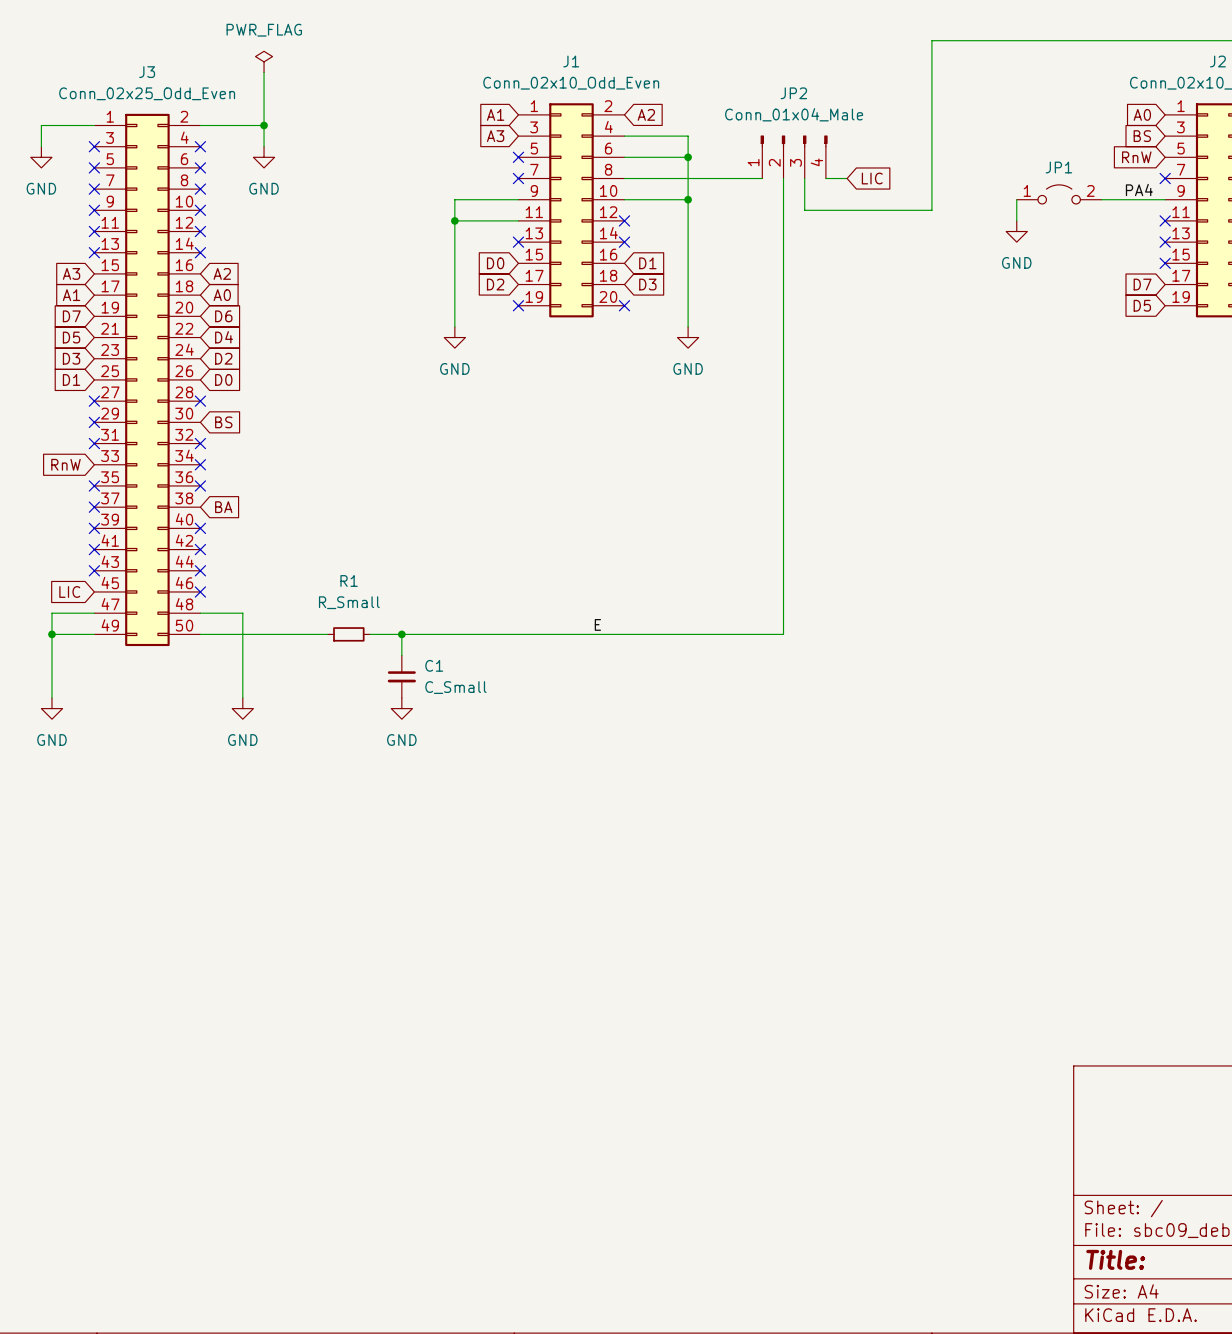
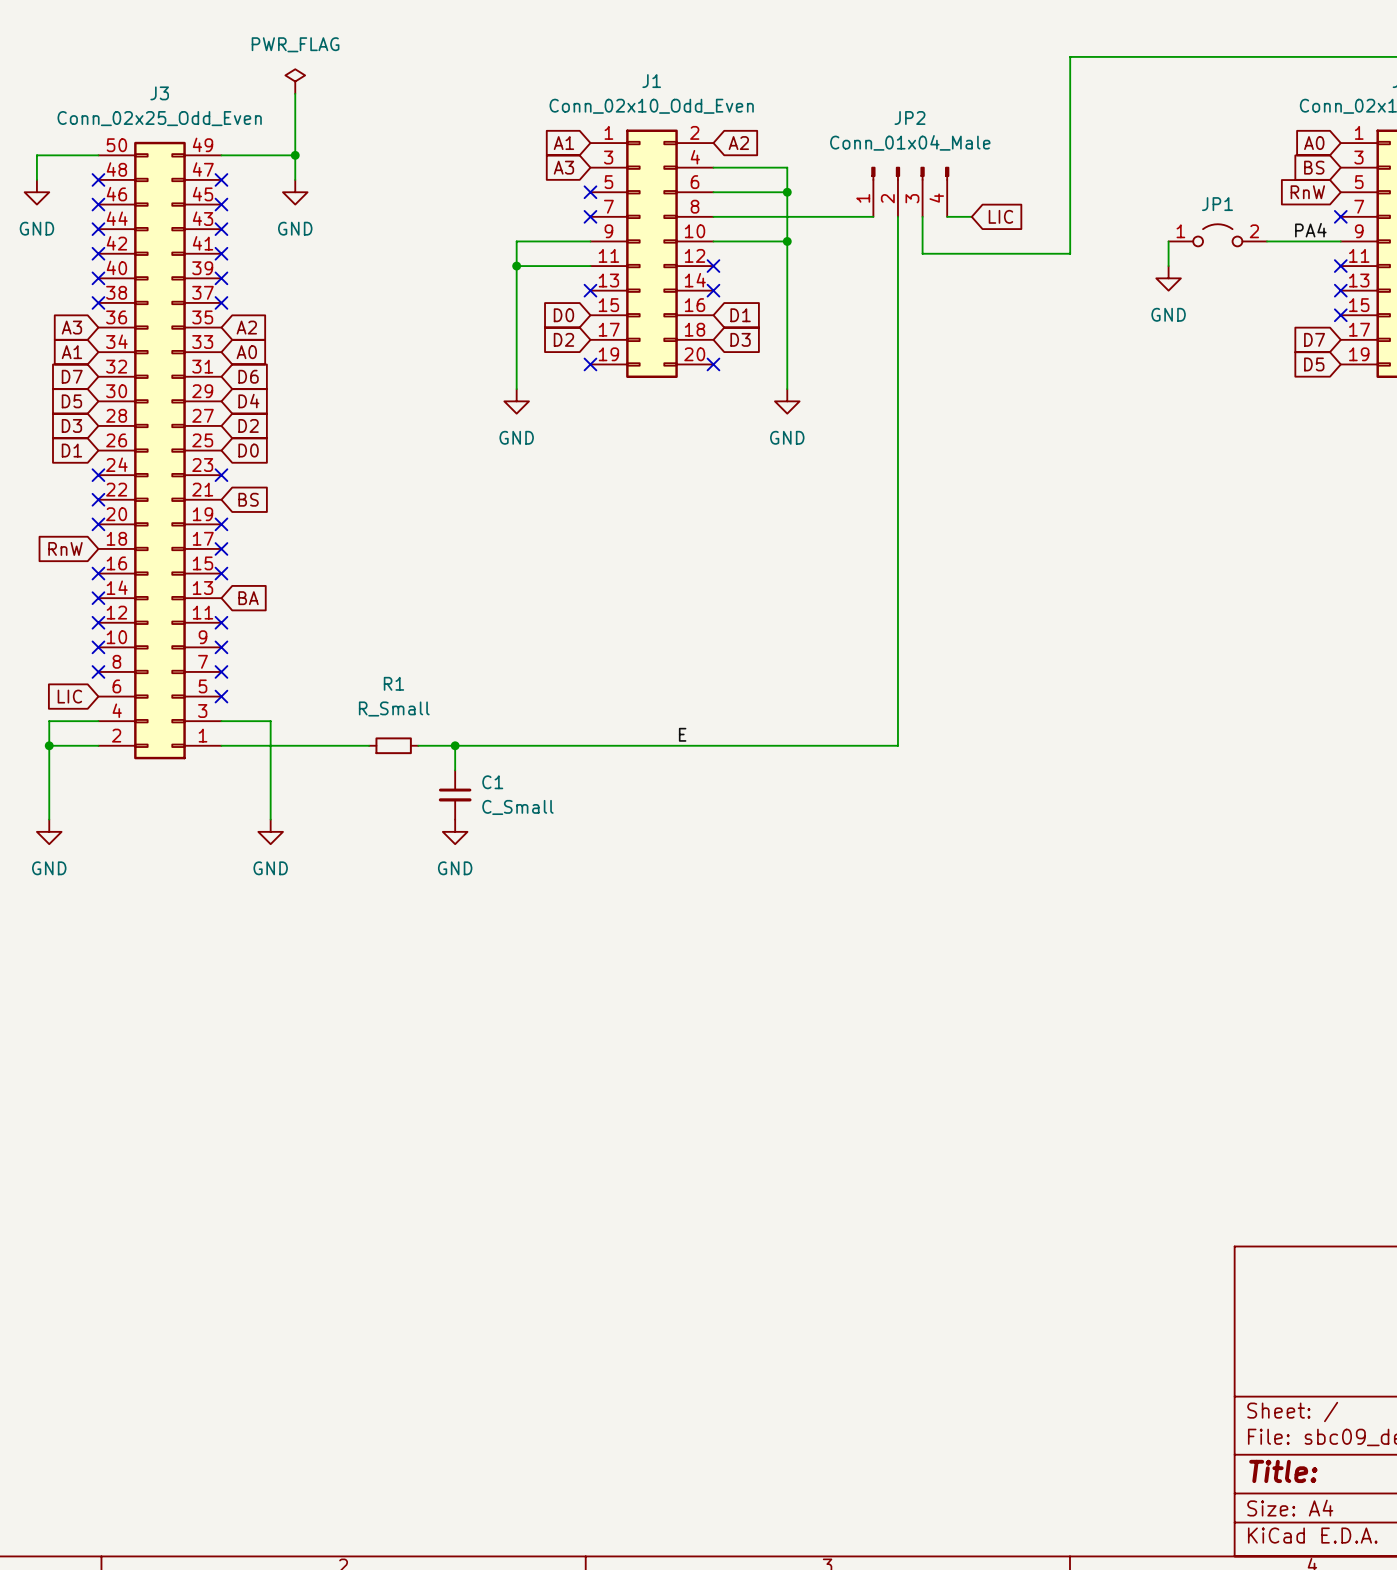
J3 rotation: 0° (147, 379) -> 180° (159, 450)

